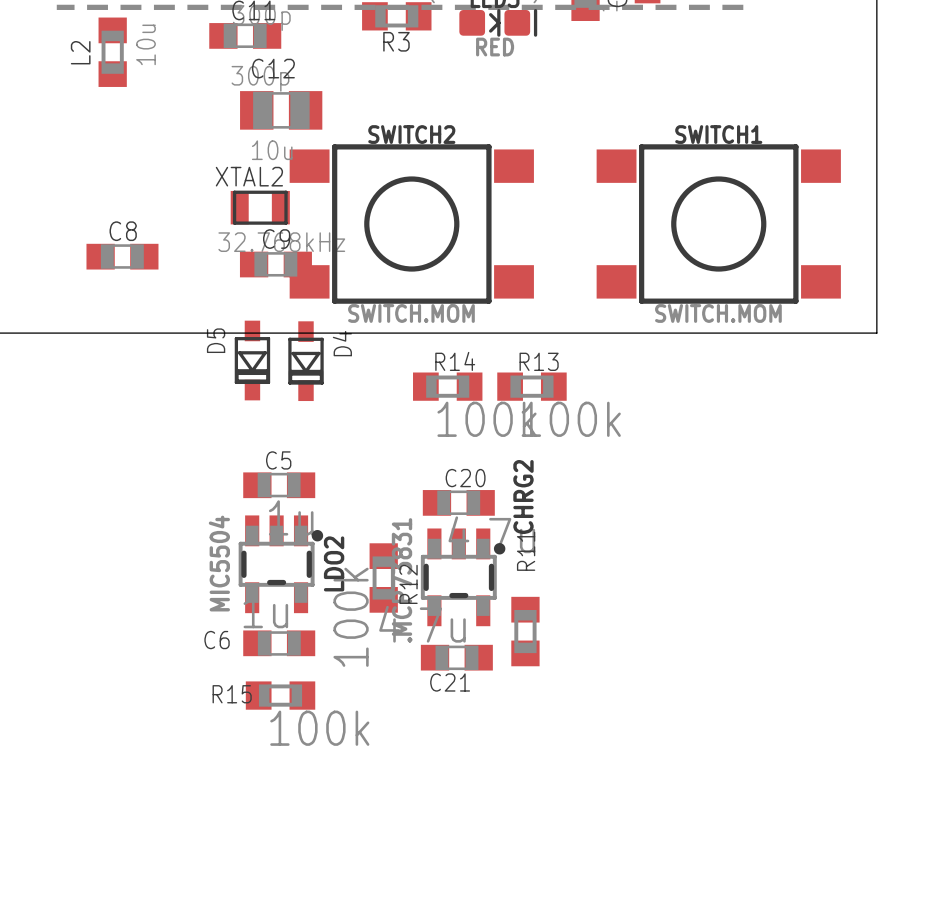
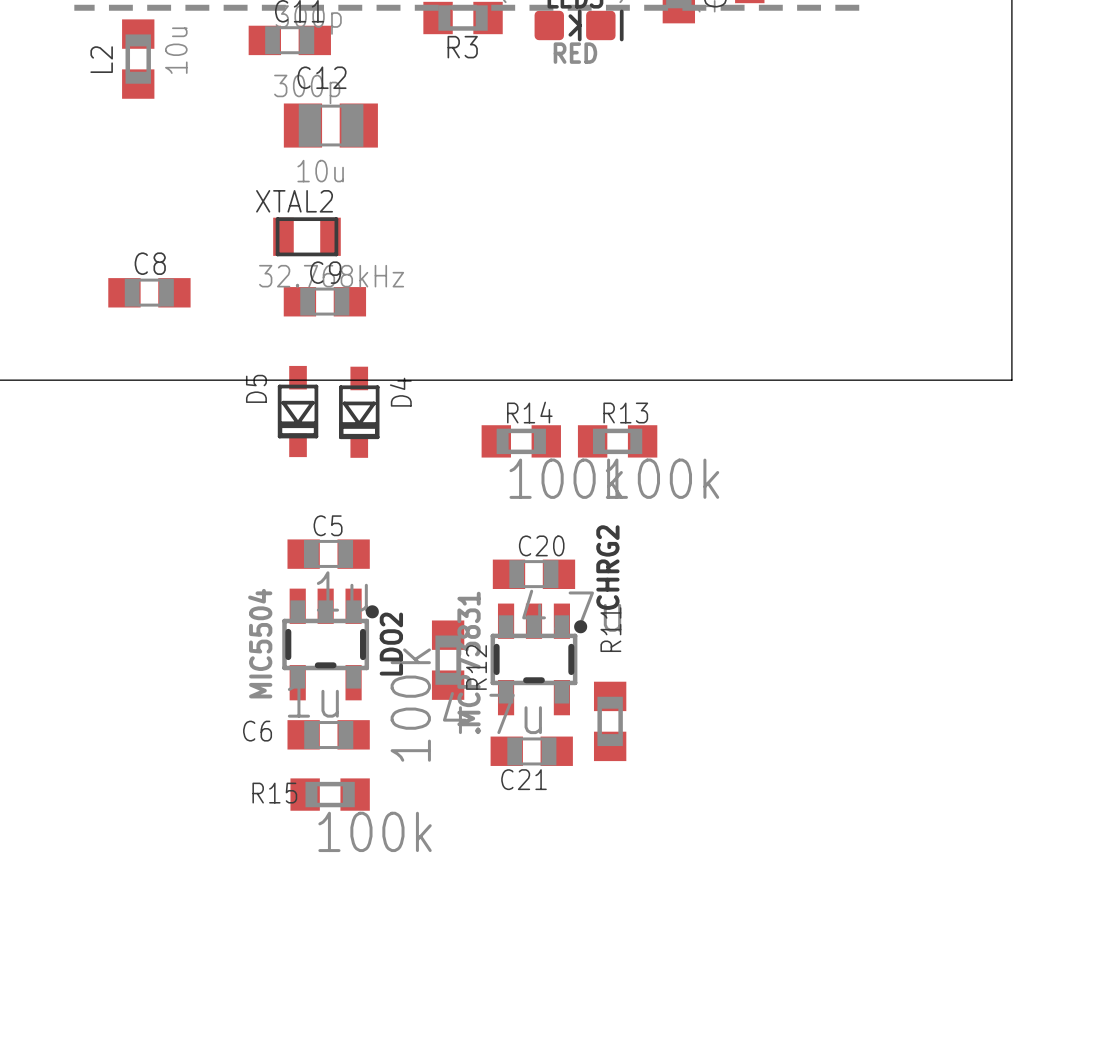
SWITCH2: SWITCH.MOM (411, 224) -> none
SWITCH1: SWITCH.MOM (718, 224) -> none

